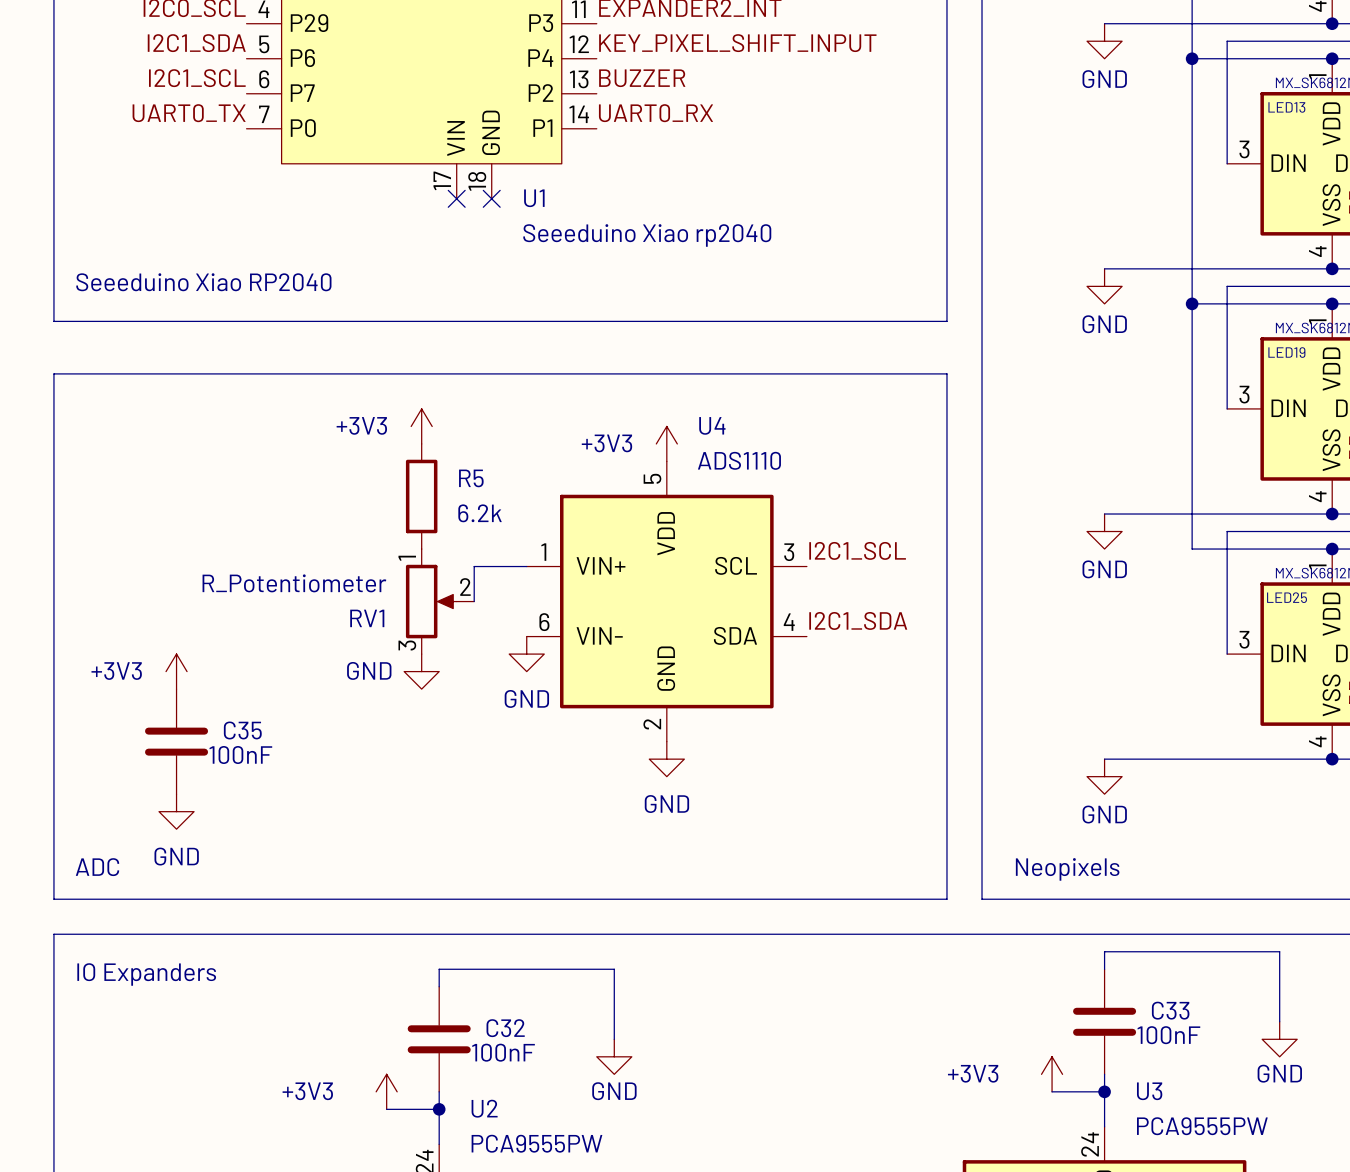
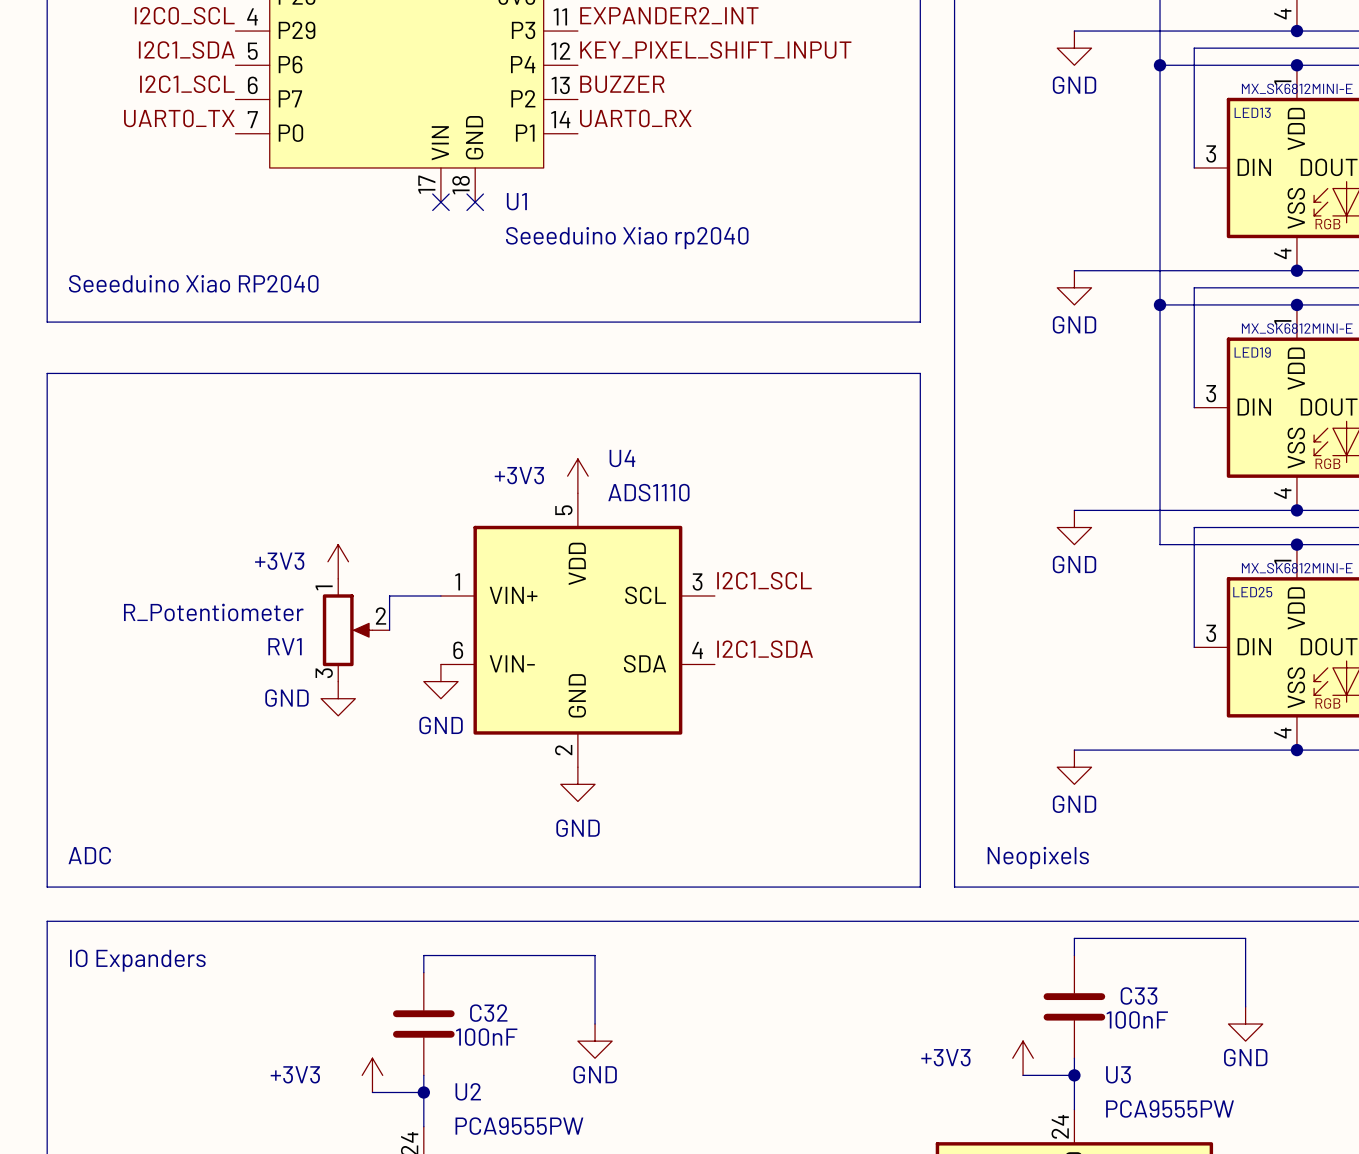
power symbol: +3V3 (421, 426) -> none
power symbol position: +3V3 (666, 443) -> +3V3 (577, 476)
R5: 6.2k (421, 496) -> none
label position: I2C1_SCL (857, 550) -> I2C1_SCL (764, 580)
power symbol: none -> +3V3 (338, 561)
wire: (526, 566) (474, 566) (474, 601) -> (440, 596) (389, 596) (389, 630)
RV1 position: (440, 601) -> (356, 630)
U4 position: (666, 601) -> (577, 630)
label position: I2C1_SDA (858, 620) -> I2C1_SDA (765, 649)
power symbol: GND (526, 654) -> none
power symbol: +3V3 (176, 671) -> none
power symbol: GND (421, 671) -> none
power symbol: none -> GND (440, 681)
power symbol: none -> GND (338, 698)
C35: 100nF (176, 741) -> none
power symbol: GND (666, 759) -> none
power symbol: none -> GND (577, 784)
power symbol: GND (176, 811) -> none

